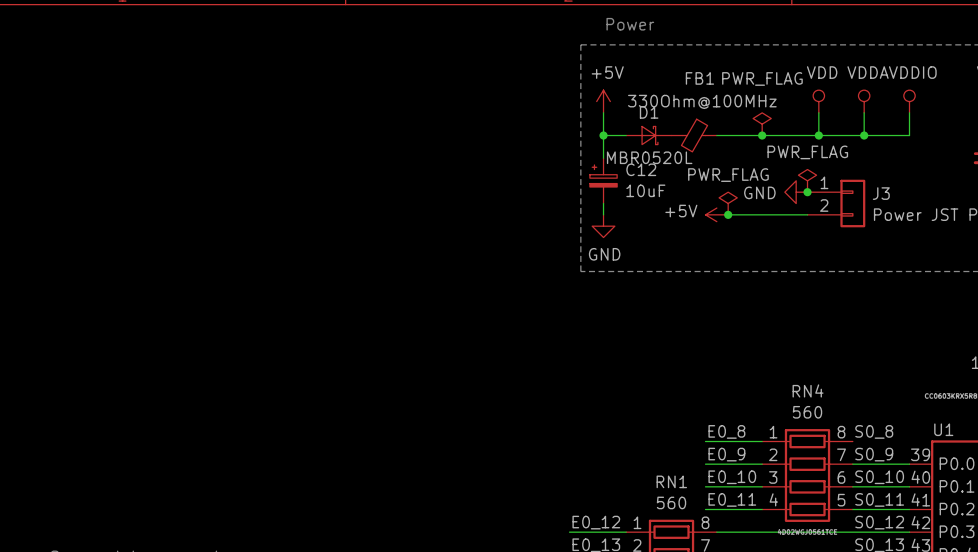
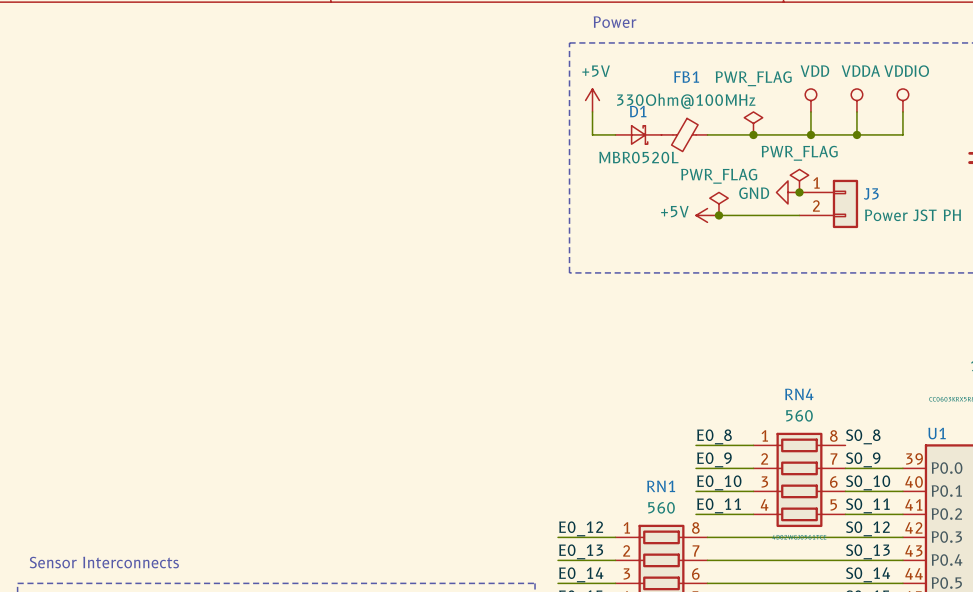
wire: (603, 135) (603, 158) -> none
junction: (603, 135) -> none
C12: 10uF (603, 180) -> none
wire: (603, 203) (603, 214) -> none
power symbol: GND (603, 226) -> none

